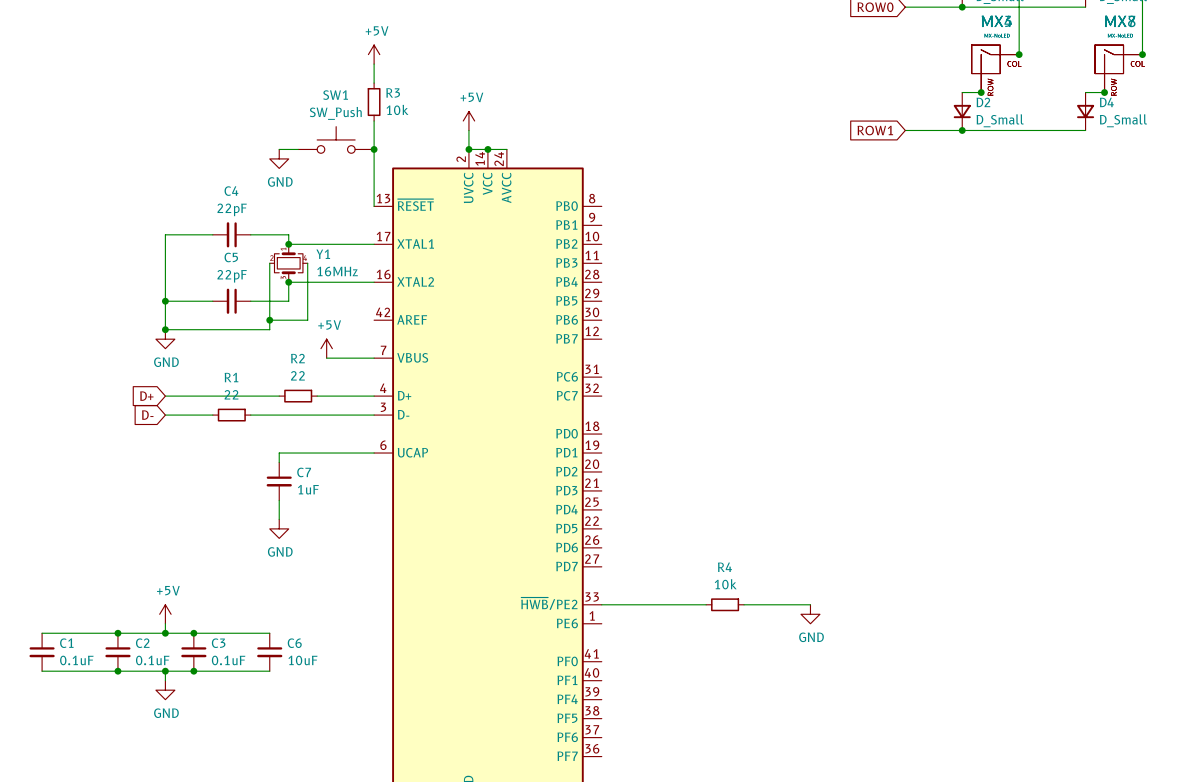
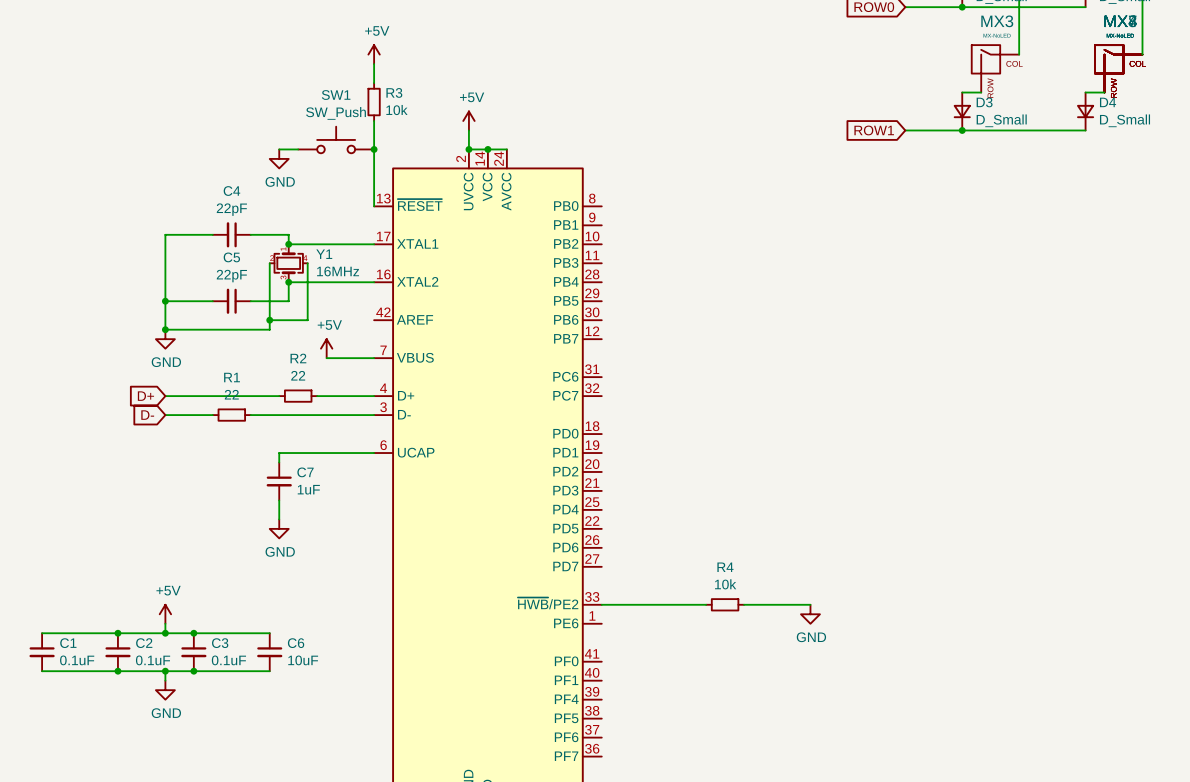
junction: (1019, 54) -> none
junction: (1142, 54) -> none
part position: (995, 68) -> (1118, 68)
junction: (981, 92) -> none
junction: (1104, 92) -> none
D2 name: D2 (983, 102) -> D3 (984, 102)

